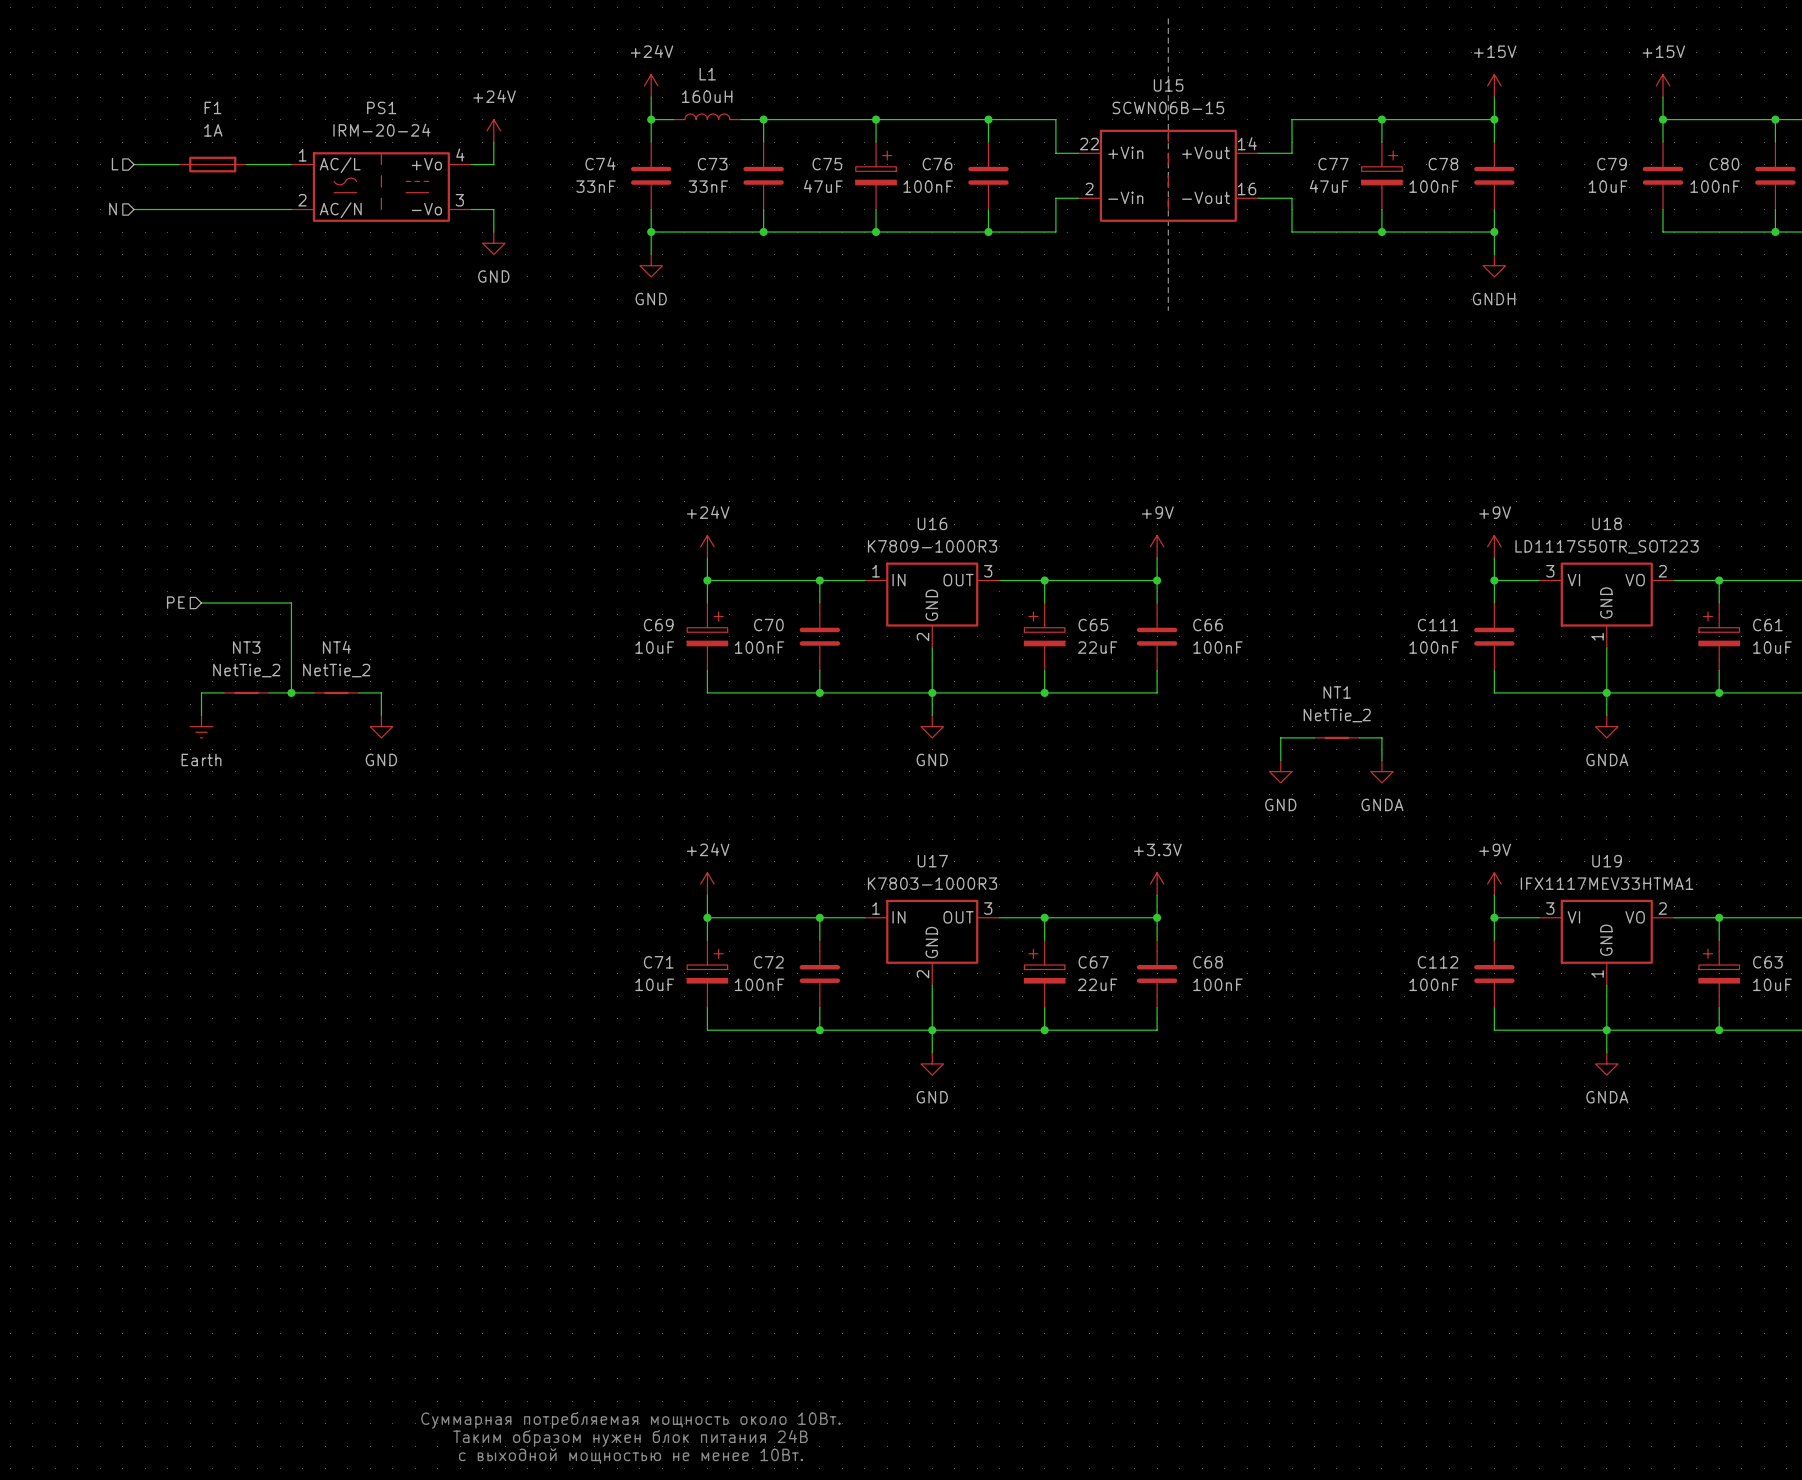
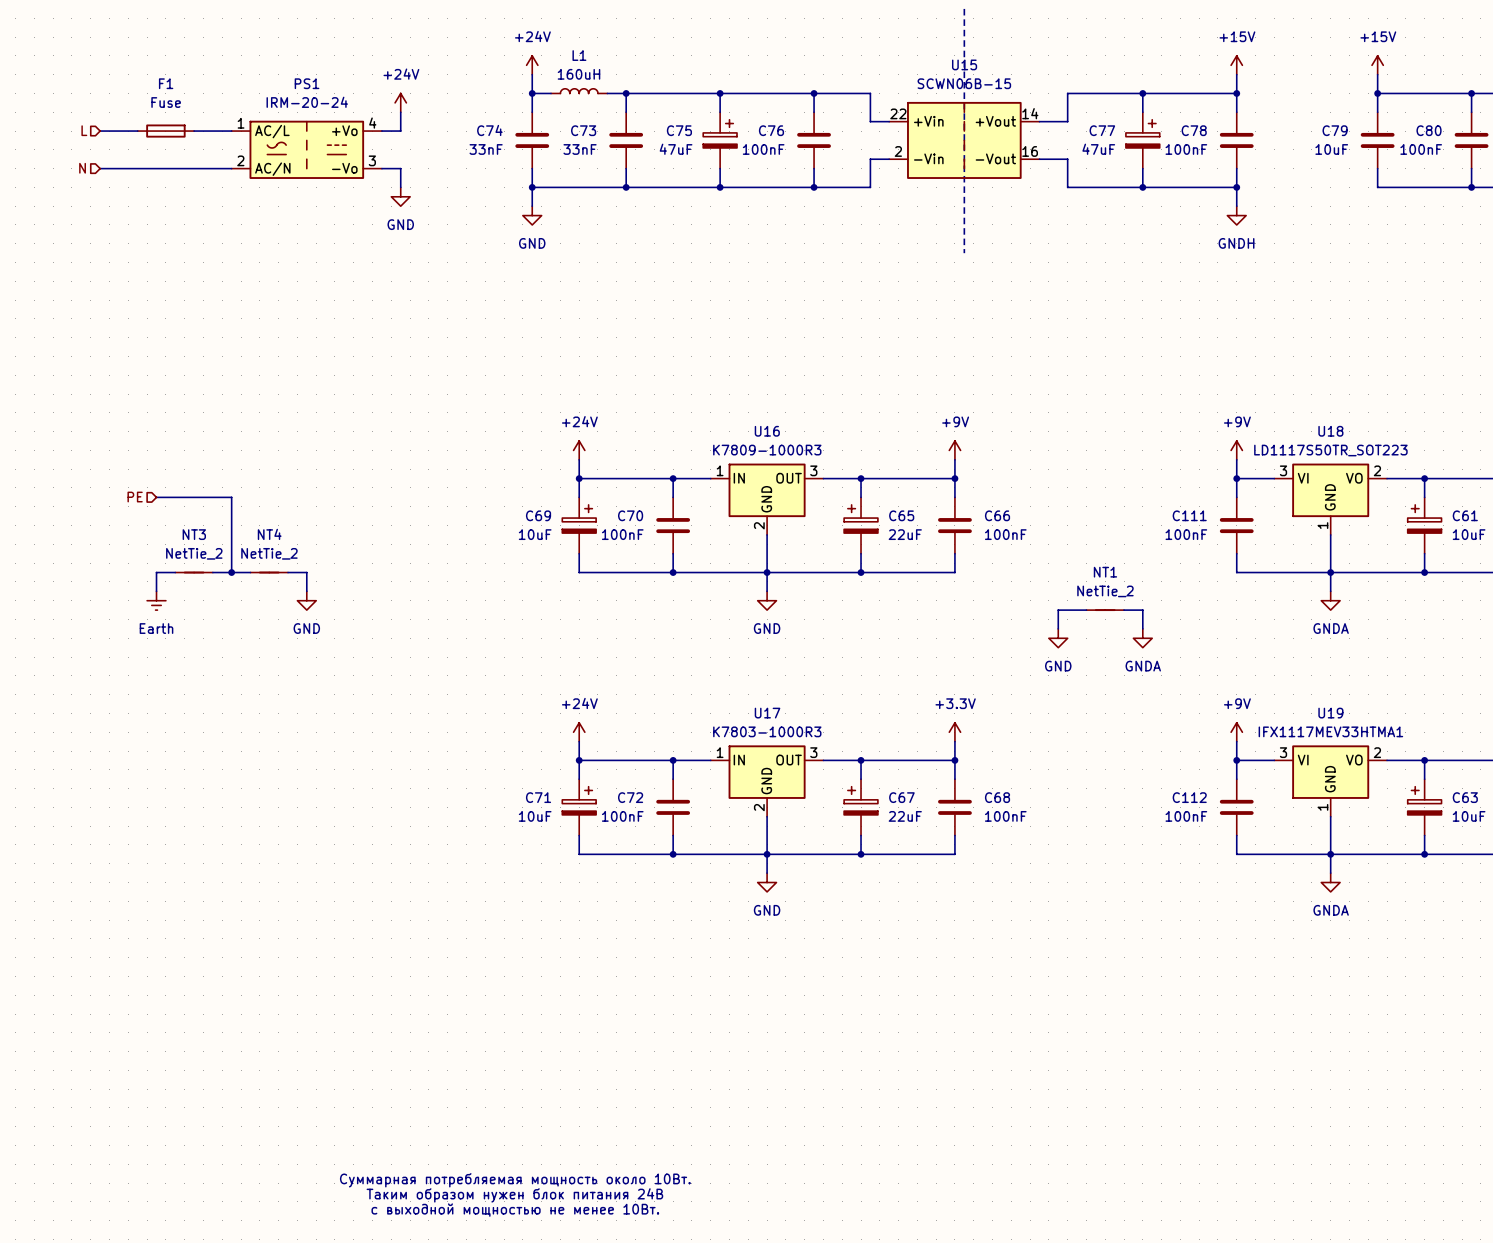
F1 value: 1A (213, 130) -> Fuse (166, 102)

